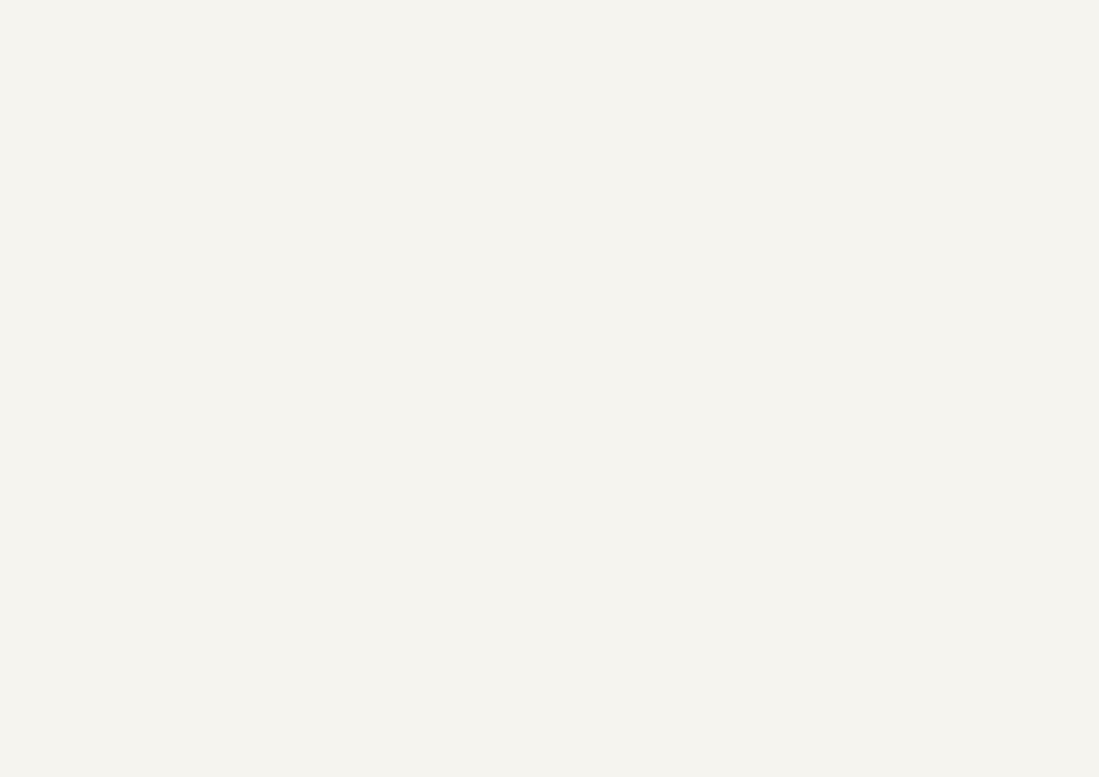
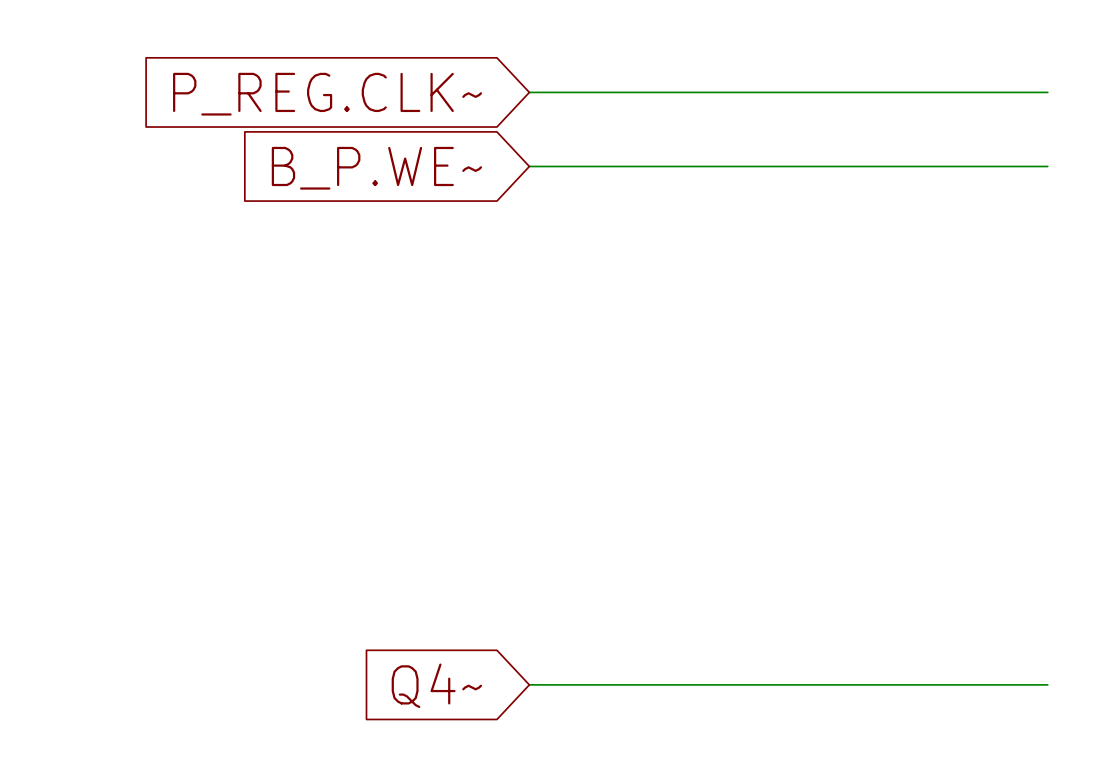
wire: none -> (529, 92) (1047, 92)
global label: none -> P_REG.CLK~ (327, 94)
wire: none -> (529, 166) (1047, 166)
global label: none -> B_P.WE~ (376, 168)
wire: none -> (529, 684) (1047, 684)
global label: none -> Q4~ (436, 685)

